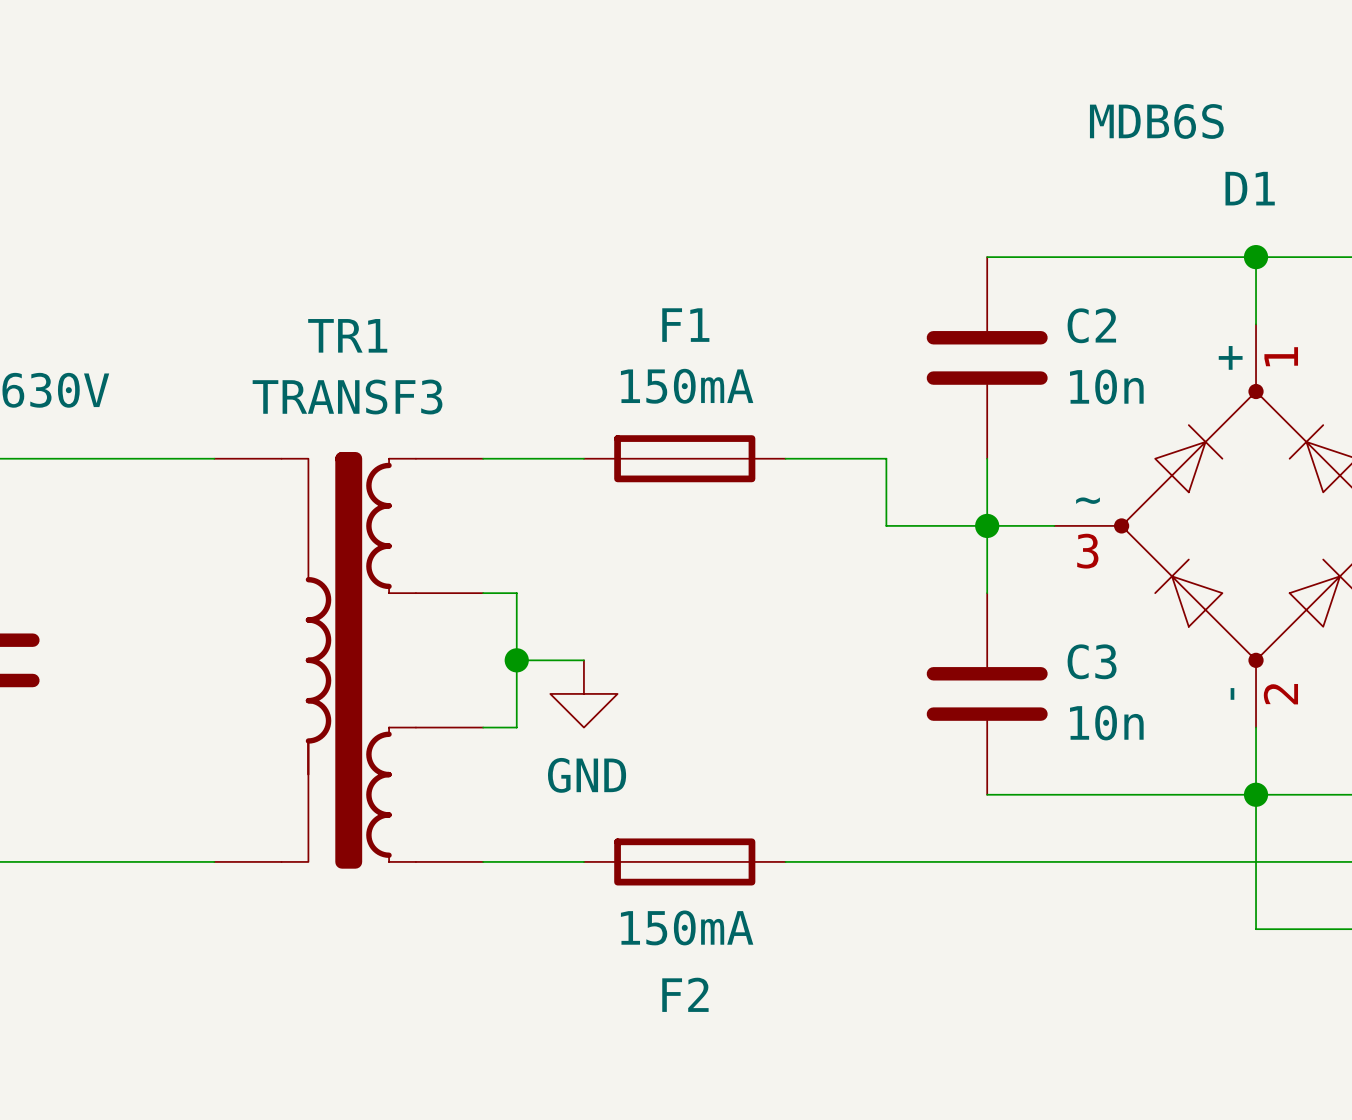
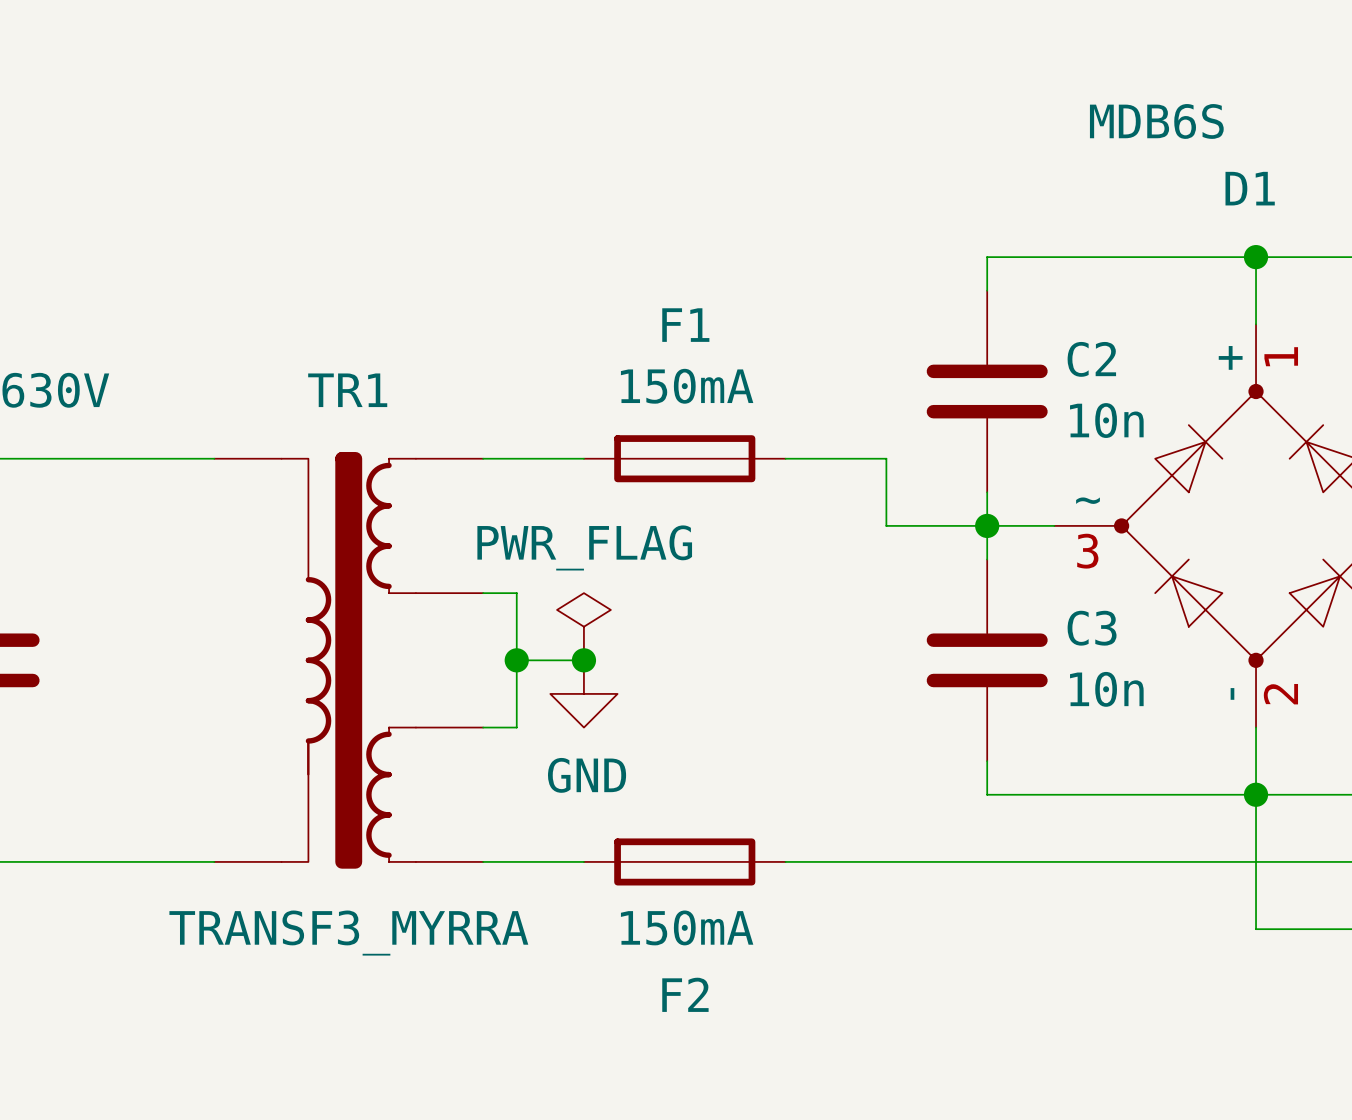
TR1 name position: TR1 (347, 335) -> TR1 (347, 390)
C2 position: (987, 357) -> (987, 391)
TR1 value: TRANSF3 (347, 397) -> TRANSF3_MYRRA (348, 933)
power symbol: none -> PWR_FLAG (583, 626)
junction: none -> (583, 660)
C3 position: (987, 693) -> (987, 660)

